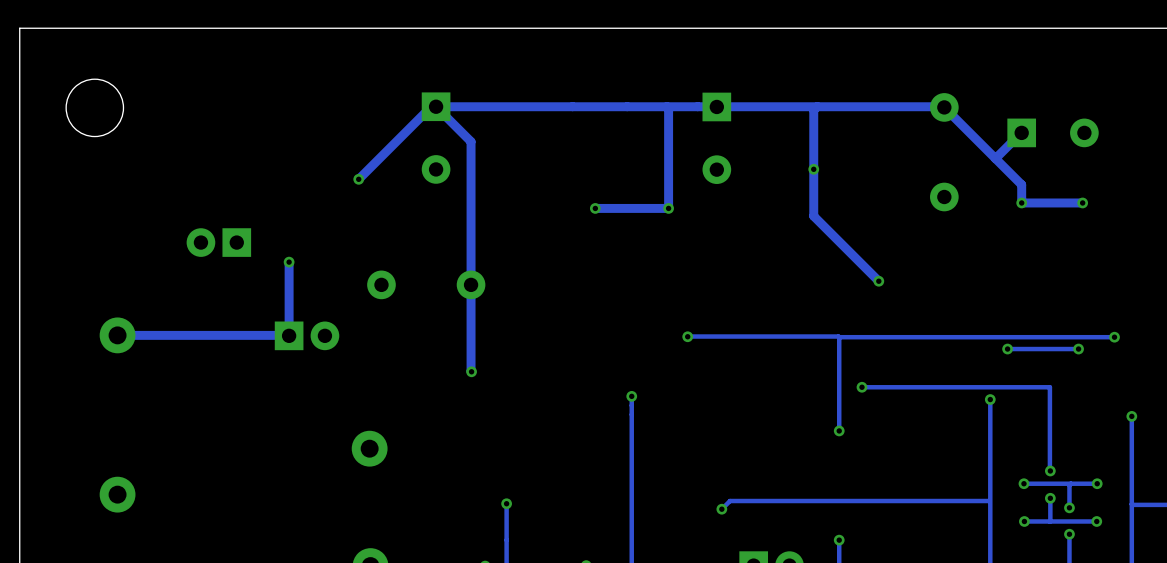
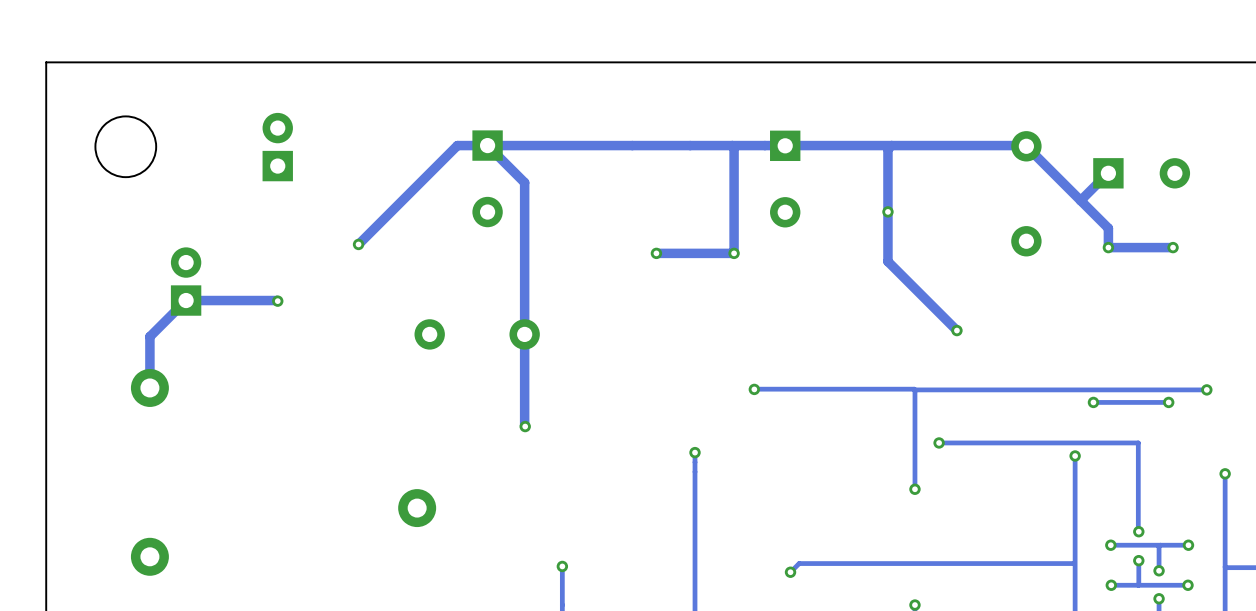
track: (431, 106) (358, 179) -> (482, 145) (457, 145) (358, 244)
part: none -> (277, 147)
via: (358, 179) -> none
via: none -> (358, 244)
part rotation: 0° (218, 242) -> 90° clockwise (186, 281)
part position: (218, 242) -> (186, 281)
via: none -> (277, 301)
track: (289, 262) (289, 335) (117, 335) -> (277, 301) (186, 300) (149, 336) (149, 387)
via: (289, 262) -> none
part: (307, 335) -> none

